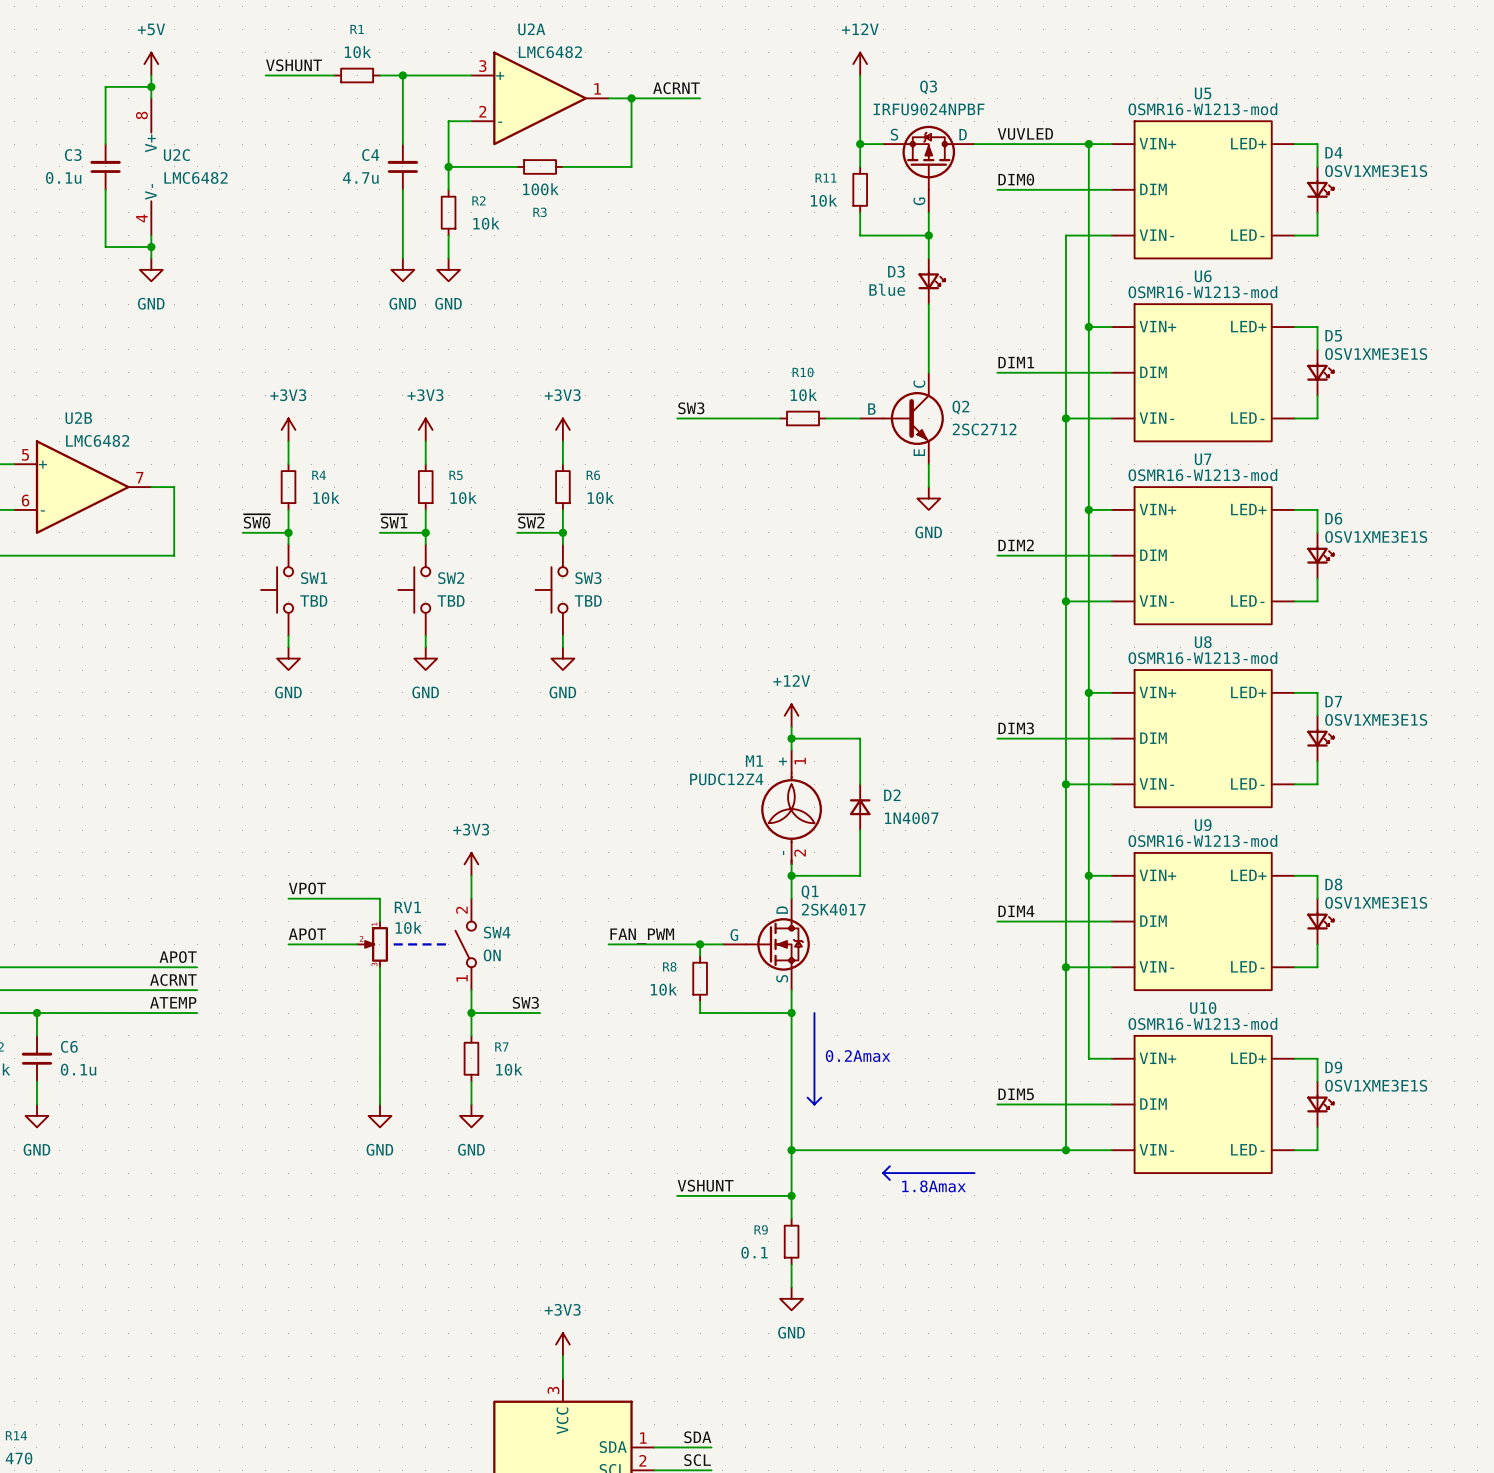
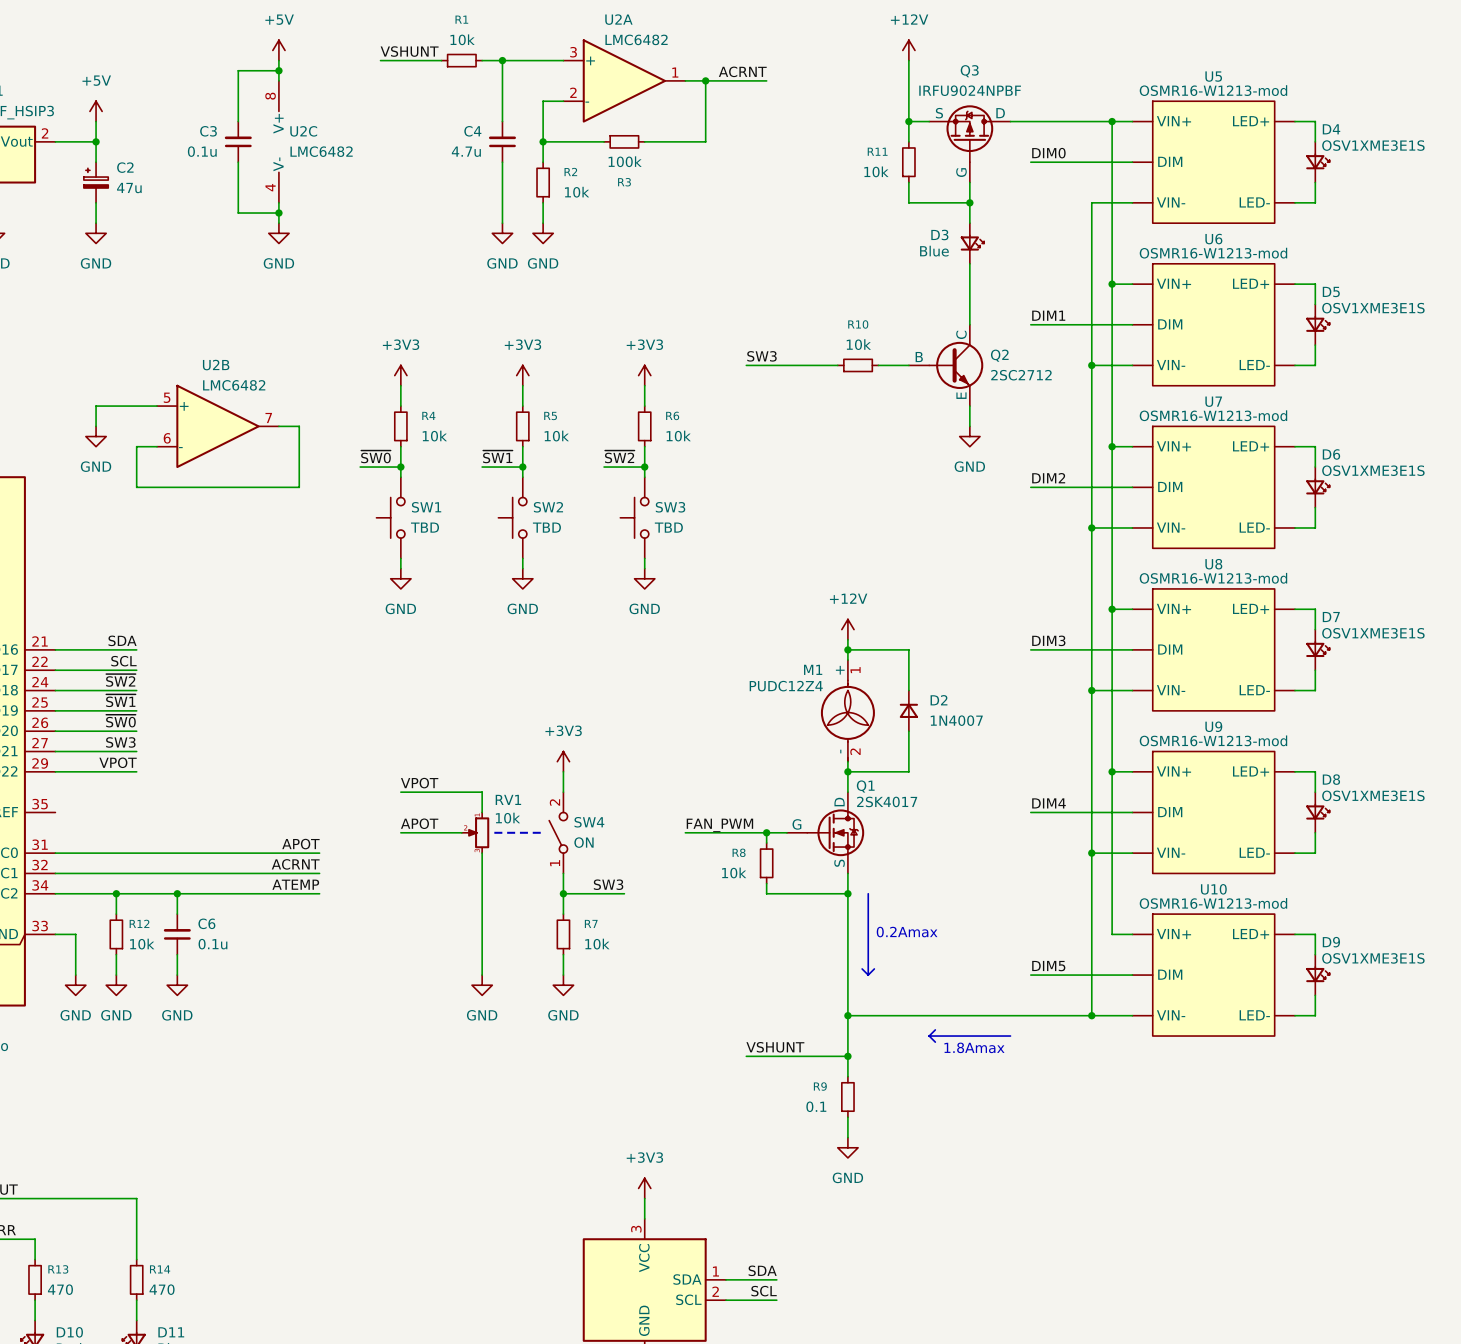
label: VUVLED (1025, 134) -> none

